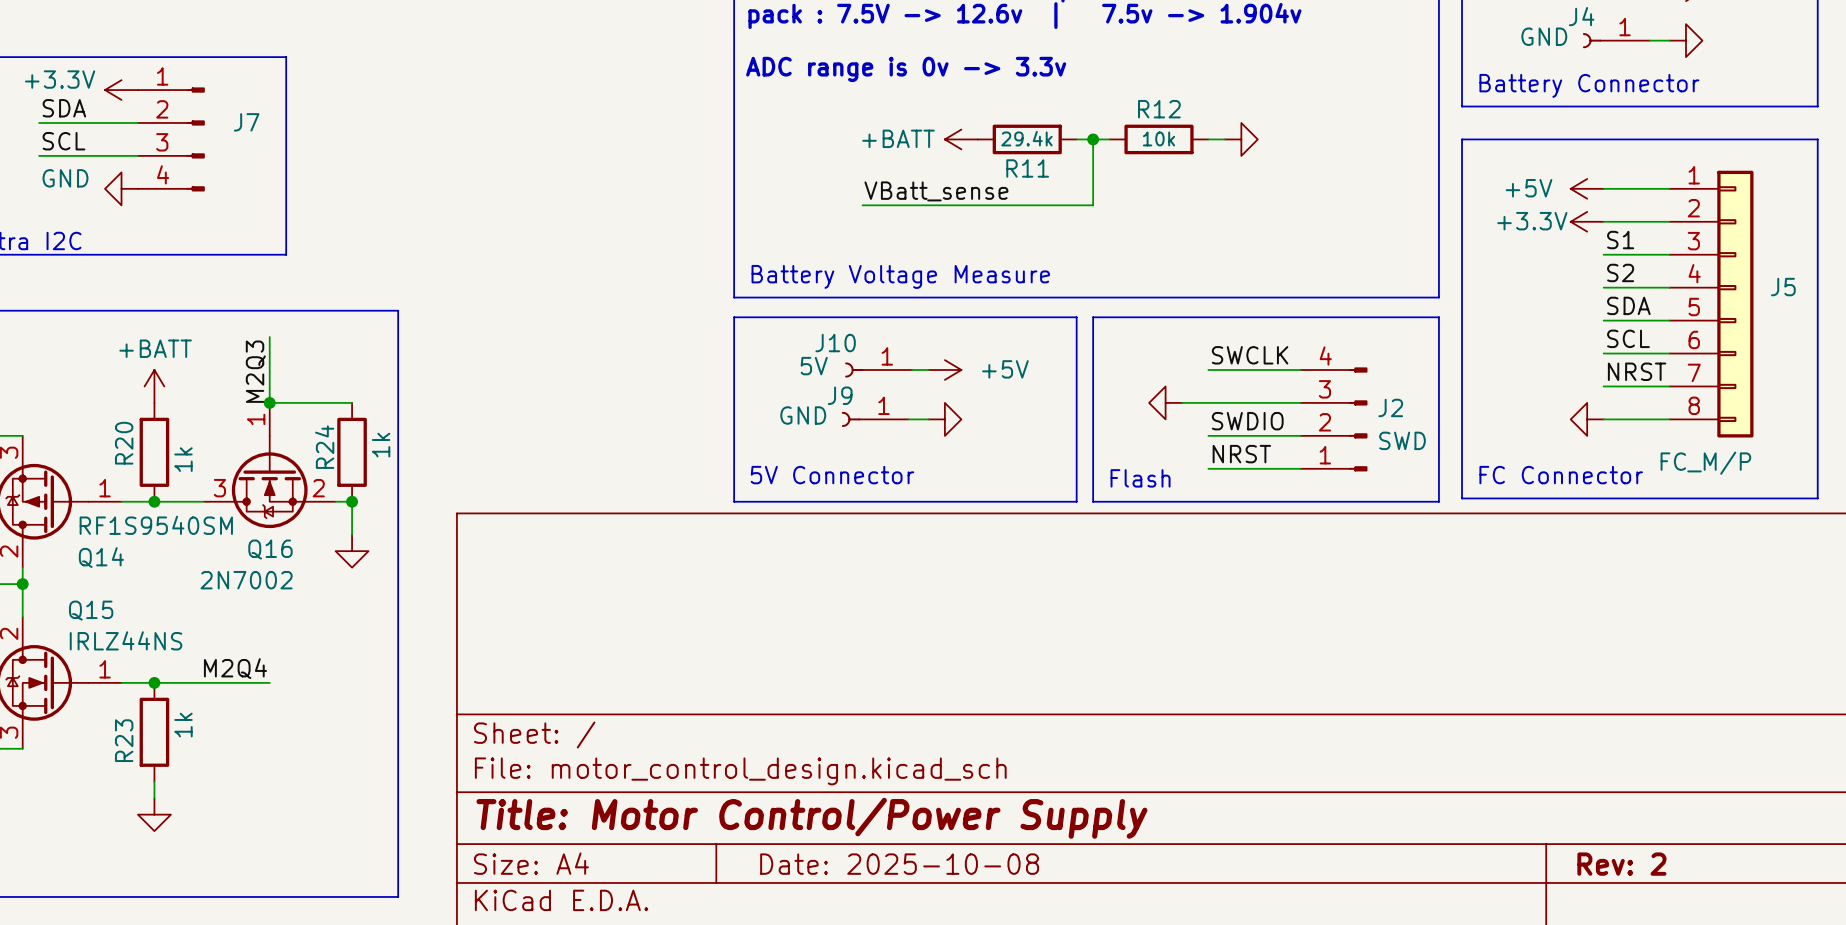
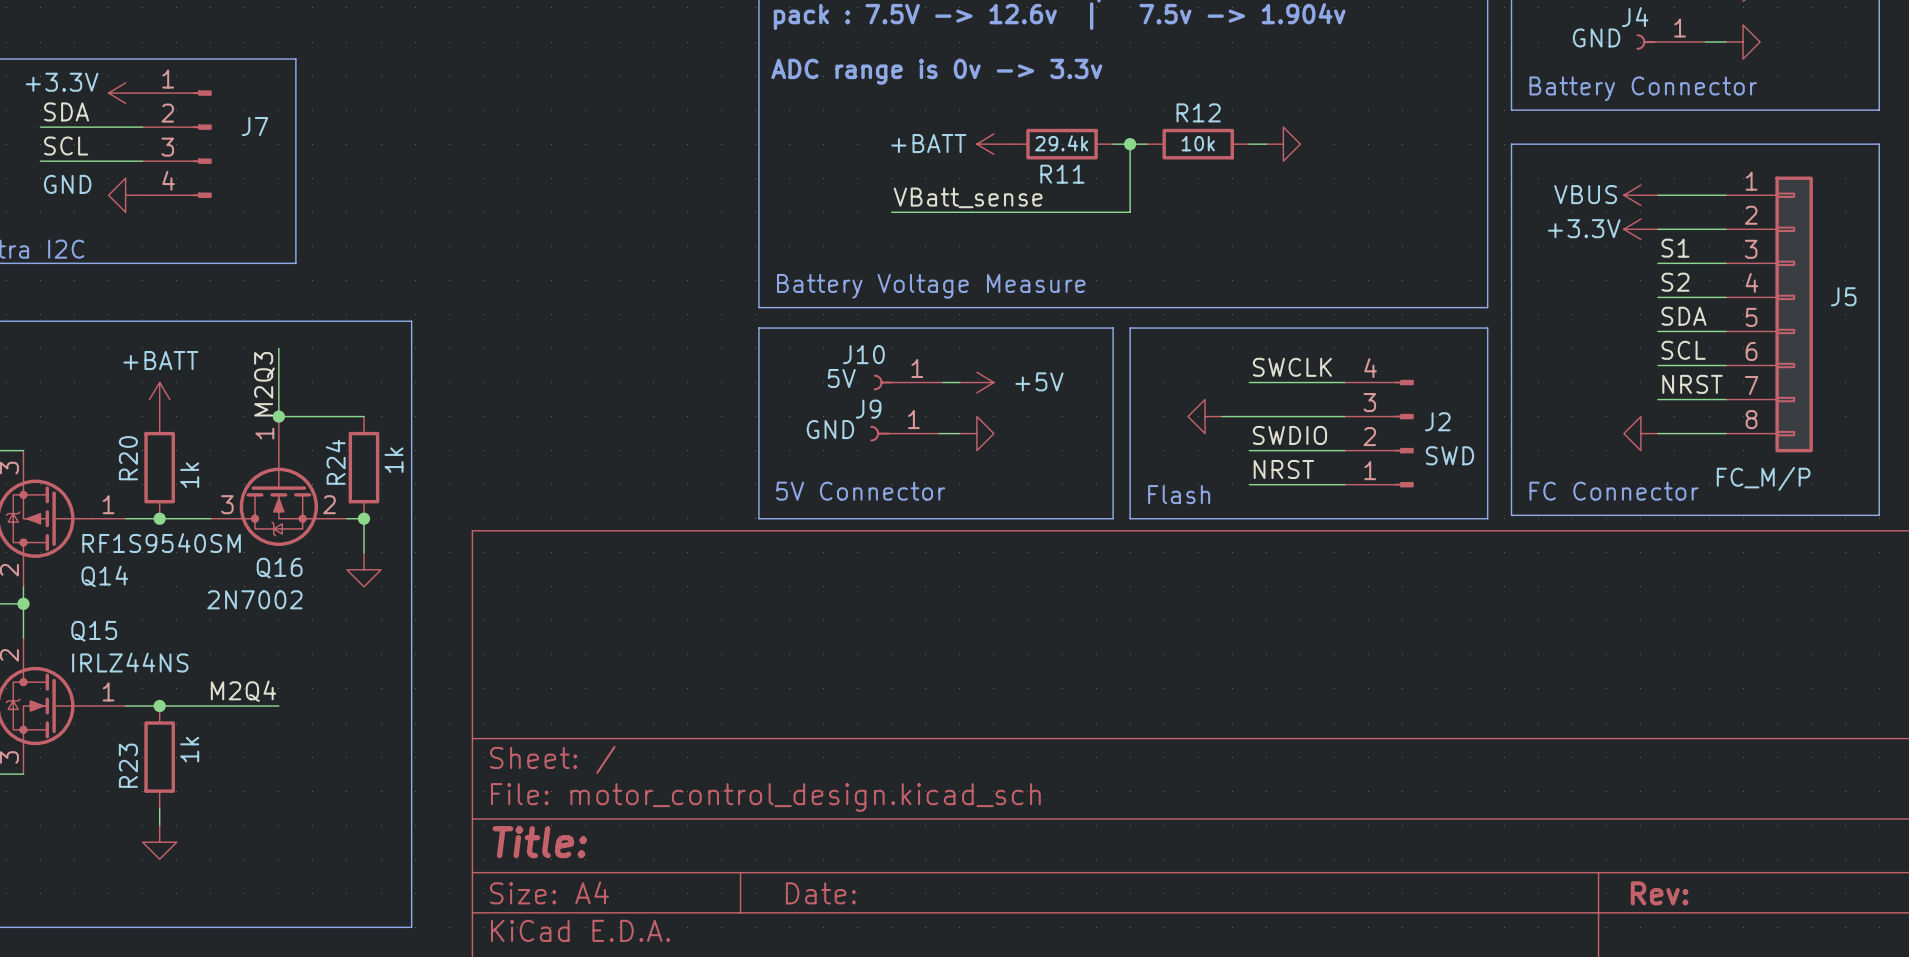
power symbol: +5V (1587, 188) -> VBUS (1640, 195)
title block: Title: Motor Control/Power Supply (811, 818) -> Title: (539, 842)
title block: Date: 2025-10-08 (899, 864) -> Date: (820, 893)
title block: Rev: 2 (1621, 864) -> Rev: (1659, 893)

